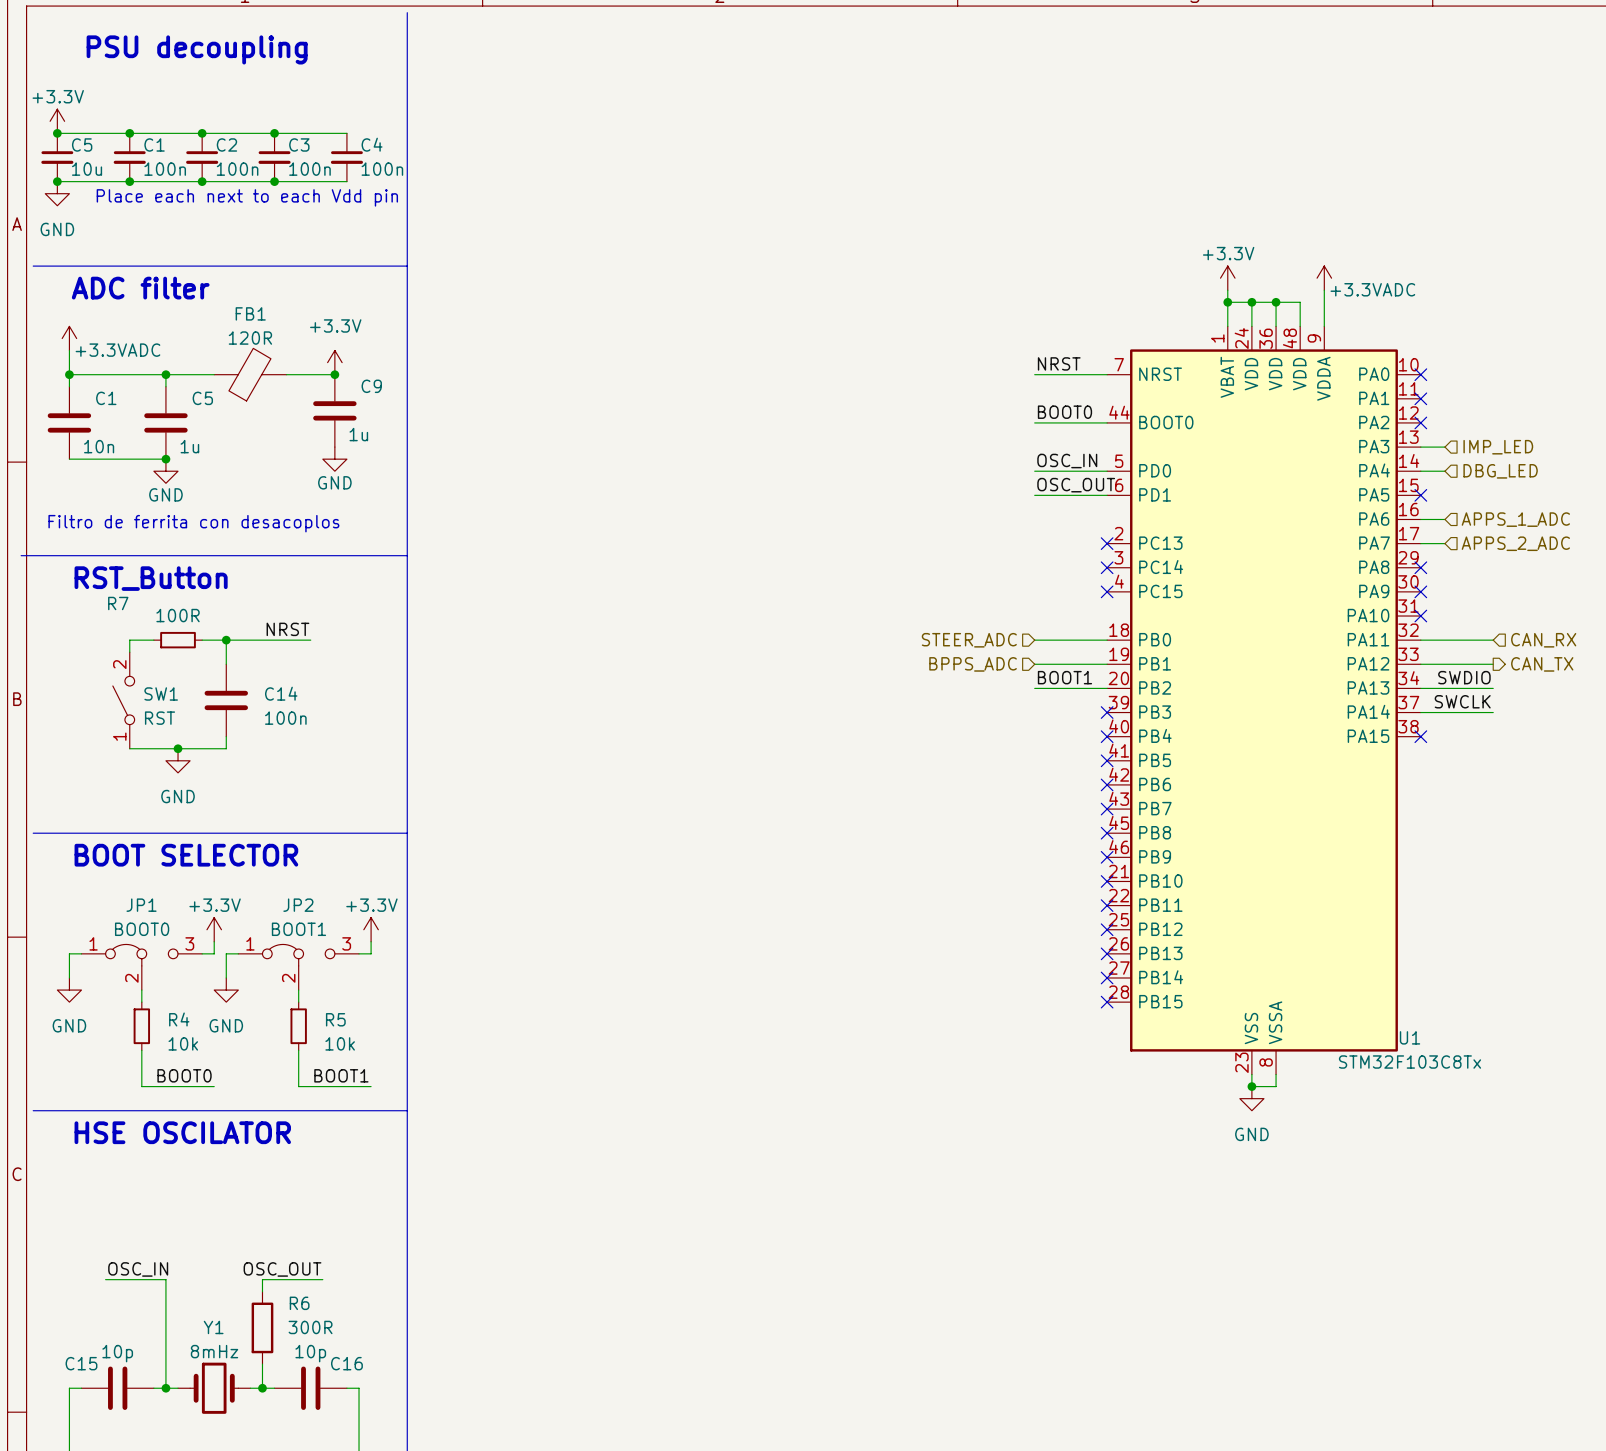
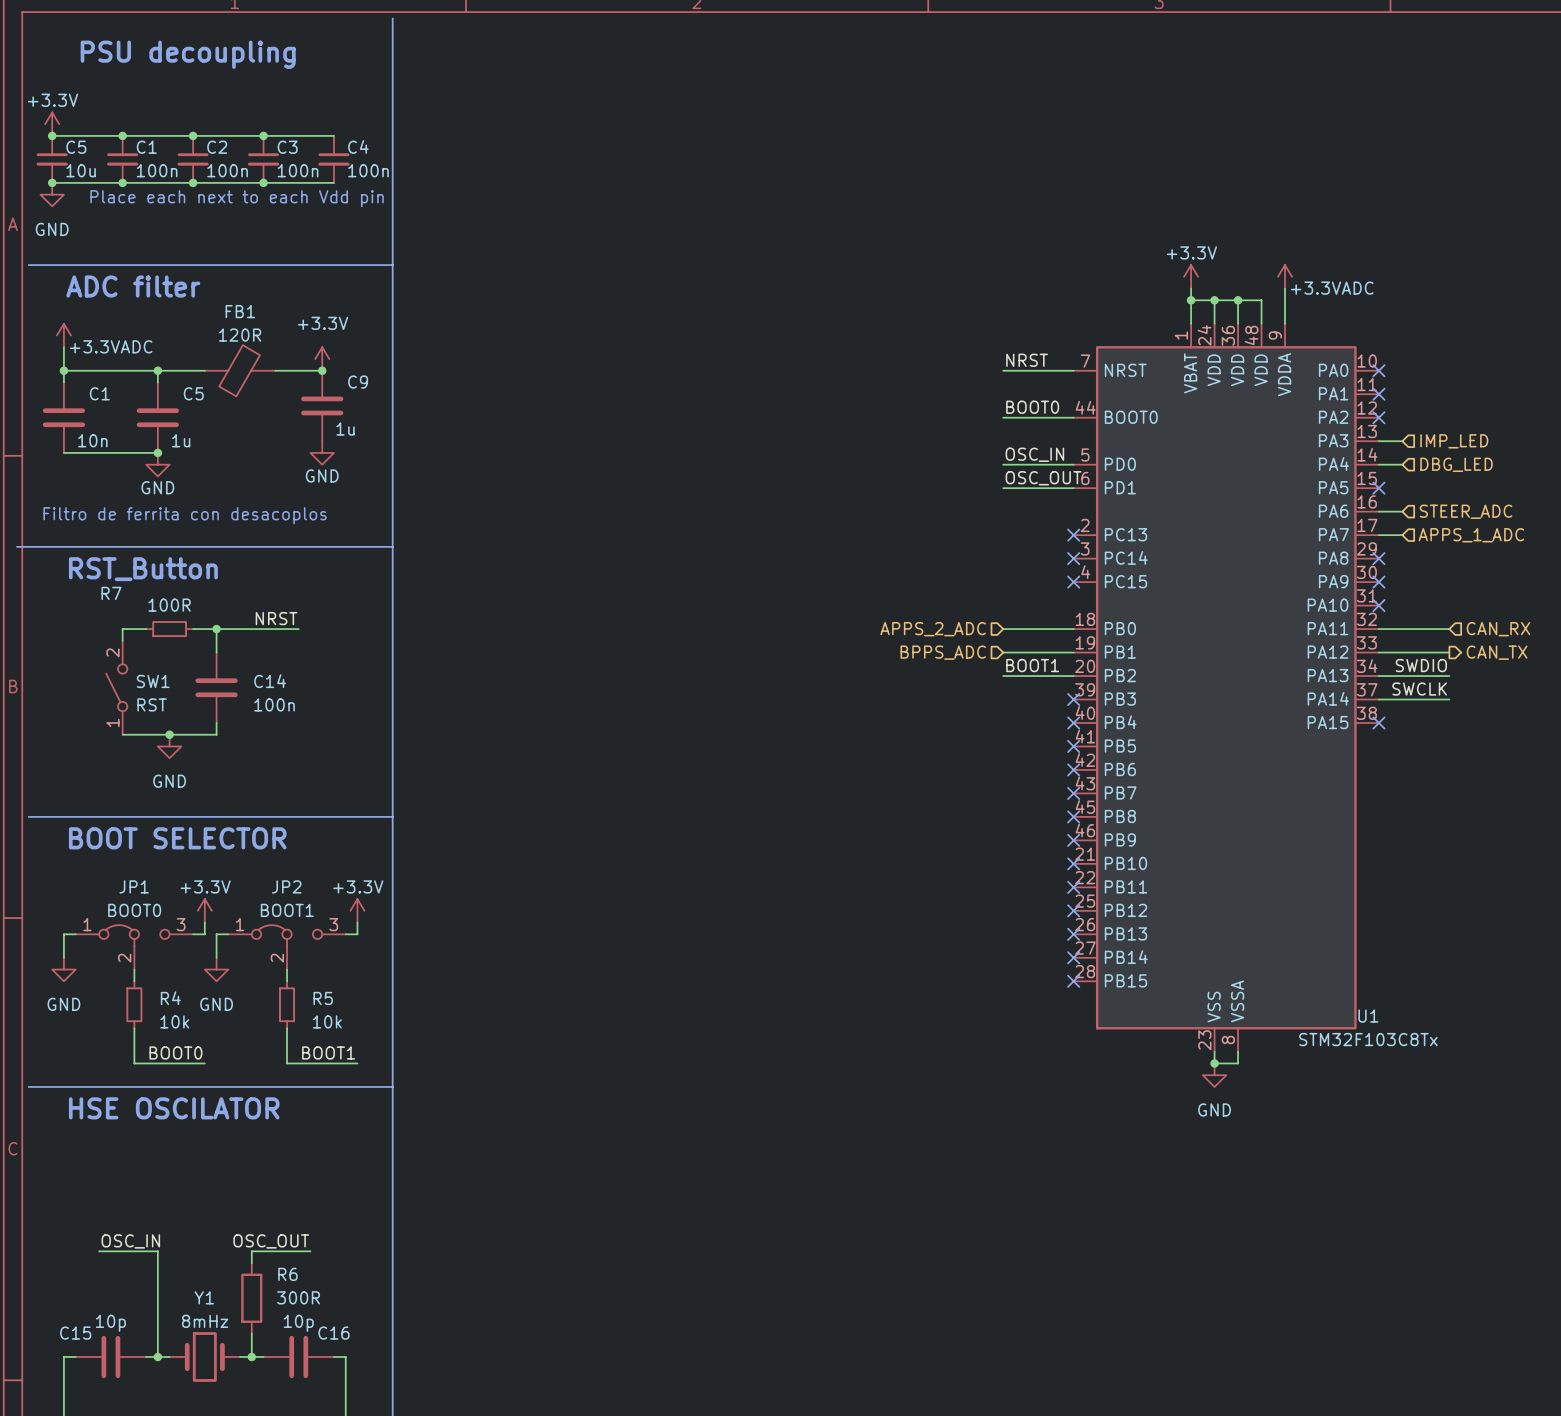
hierarchical label: APPS_1_ADC (1515, 519) -> STEER_ADC (1466, 511)
hierarchical label: APPS_2_ADC (1515, 543) -> APPS_1_ADC (1471, 535)
hierarchical label: STEER_ADC (969, 640) -> APPS_2_ADC (933, 629)

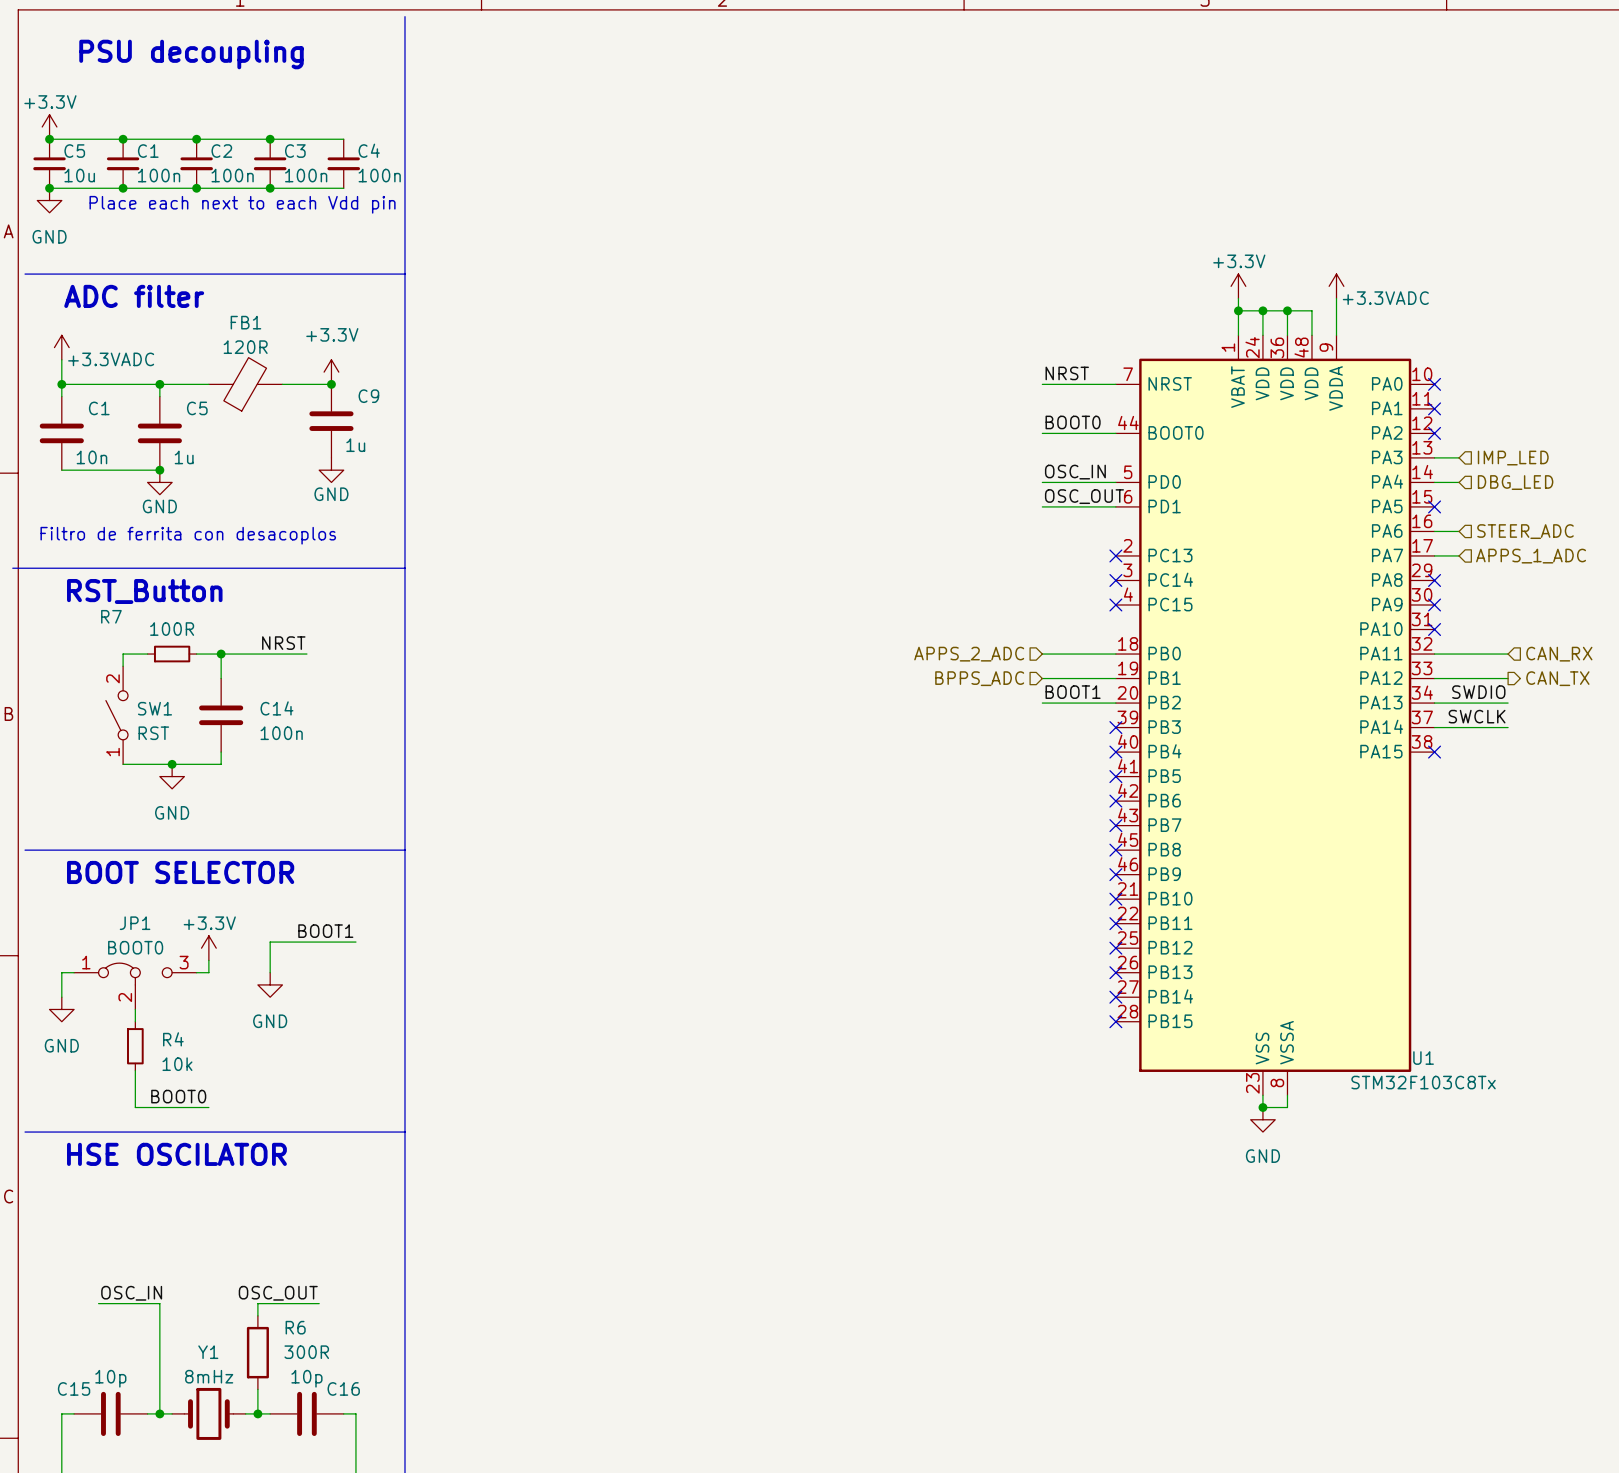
wire: none -> (355, 942) (270, 942) (270, 972)
power symbol: +3.3V (357, 910) -> none
wire: (357, 922) (357, 934) (345, 934) -> none
wire: (228, 934) (216, 934) (216, 957) -> none
JP2: BOOT1 (287, 947) -> none
power symbol position: GND (216, 969) -> GND (270, 984)
wire: (287, 969) (287, 981) -> none
R5: 10k (287, 1004) -> none
wire: (287, 1028) (287, 1063) (357, 1063) -> none
label position: BOOT1 (328, 1053) -> BOOT1 (325, 931)

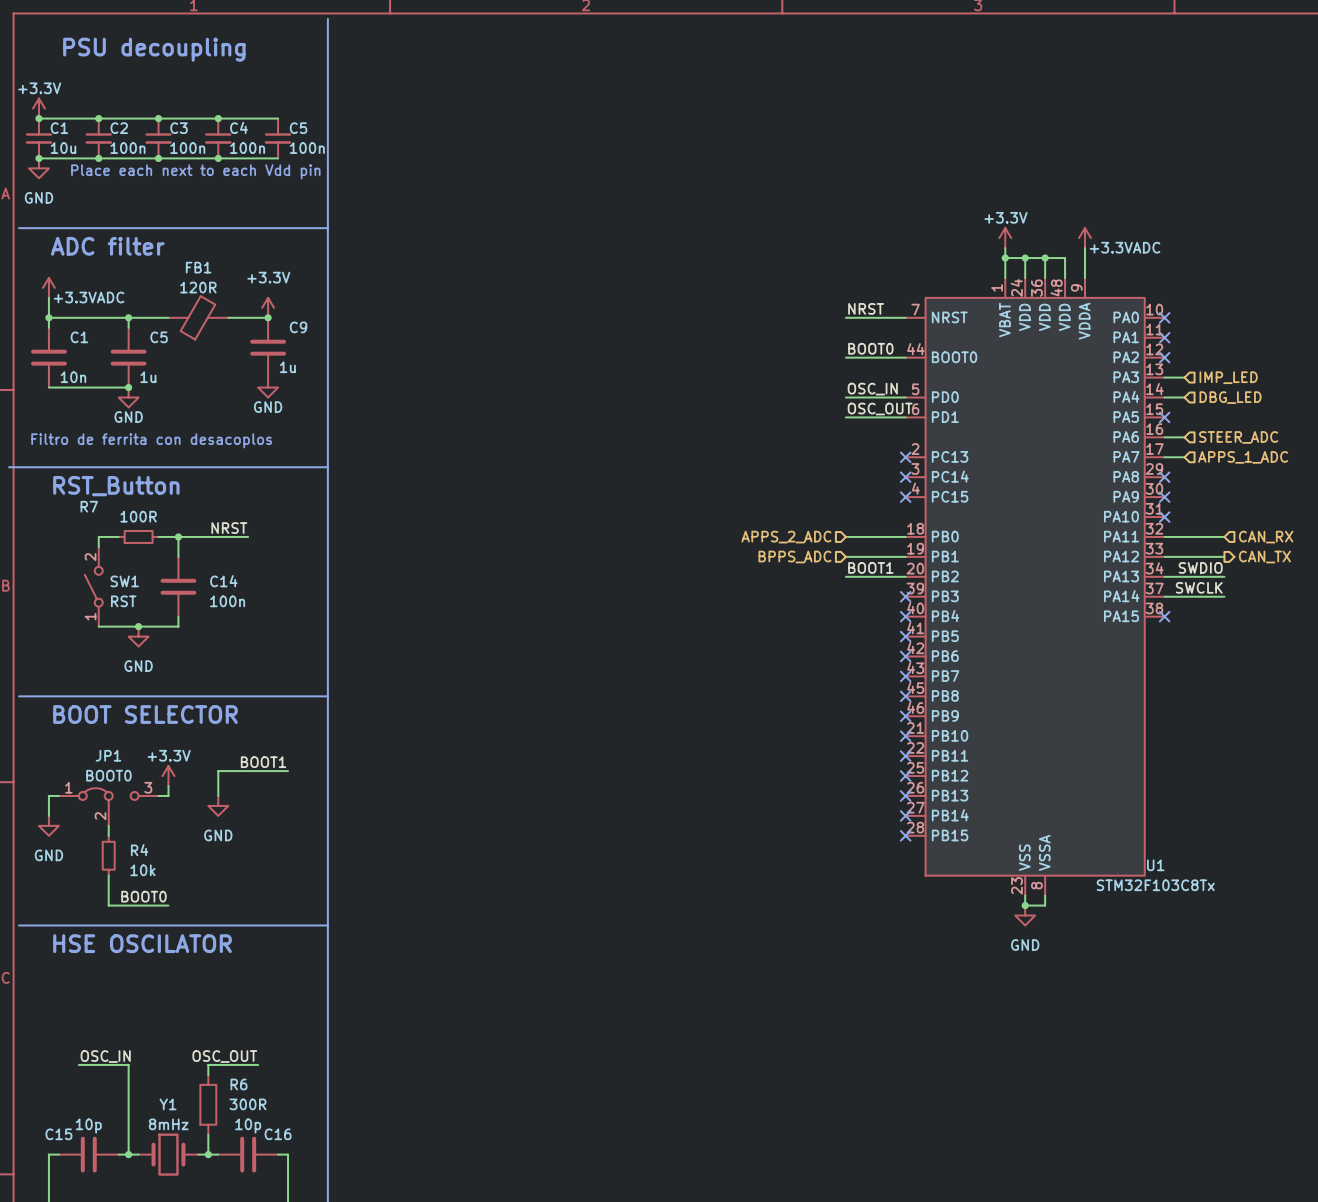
C4 name: C4 (369, 150) -> C5 (298, 128)
C5 name: C5 (74, 151) -> C1 (59, 128)
C1 name: C1 (148, 151) -> C2 (119, 128)
C2 name: C2 (221, 151) -> C3 (178, 128)
C3 name: C3 (295, 151) -> C4 (239, 127)

